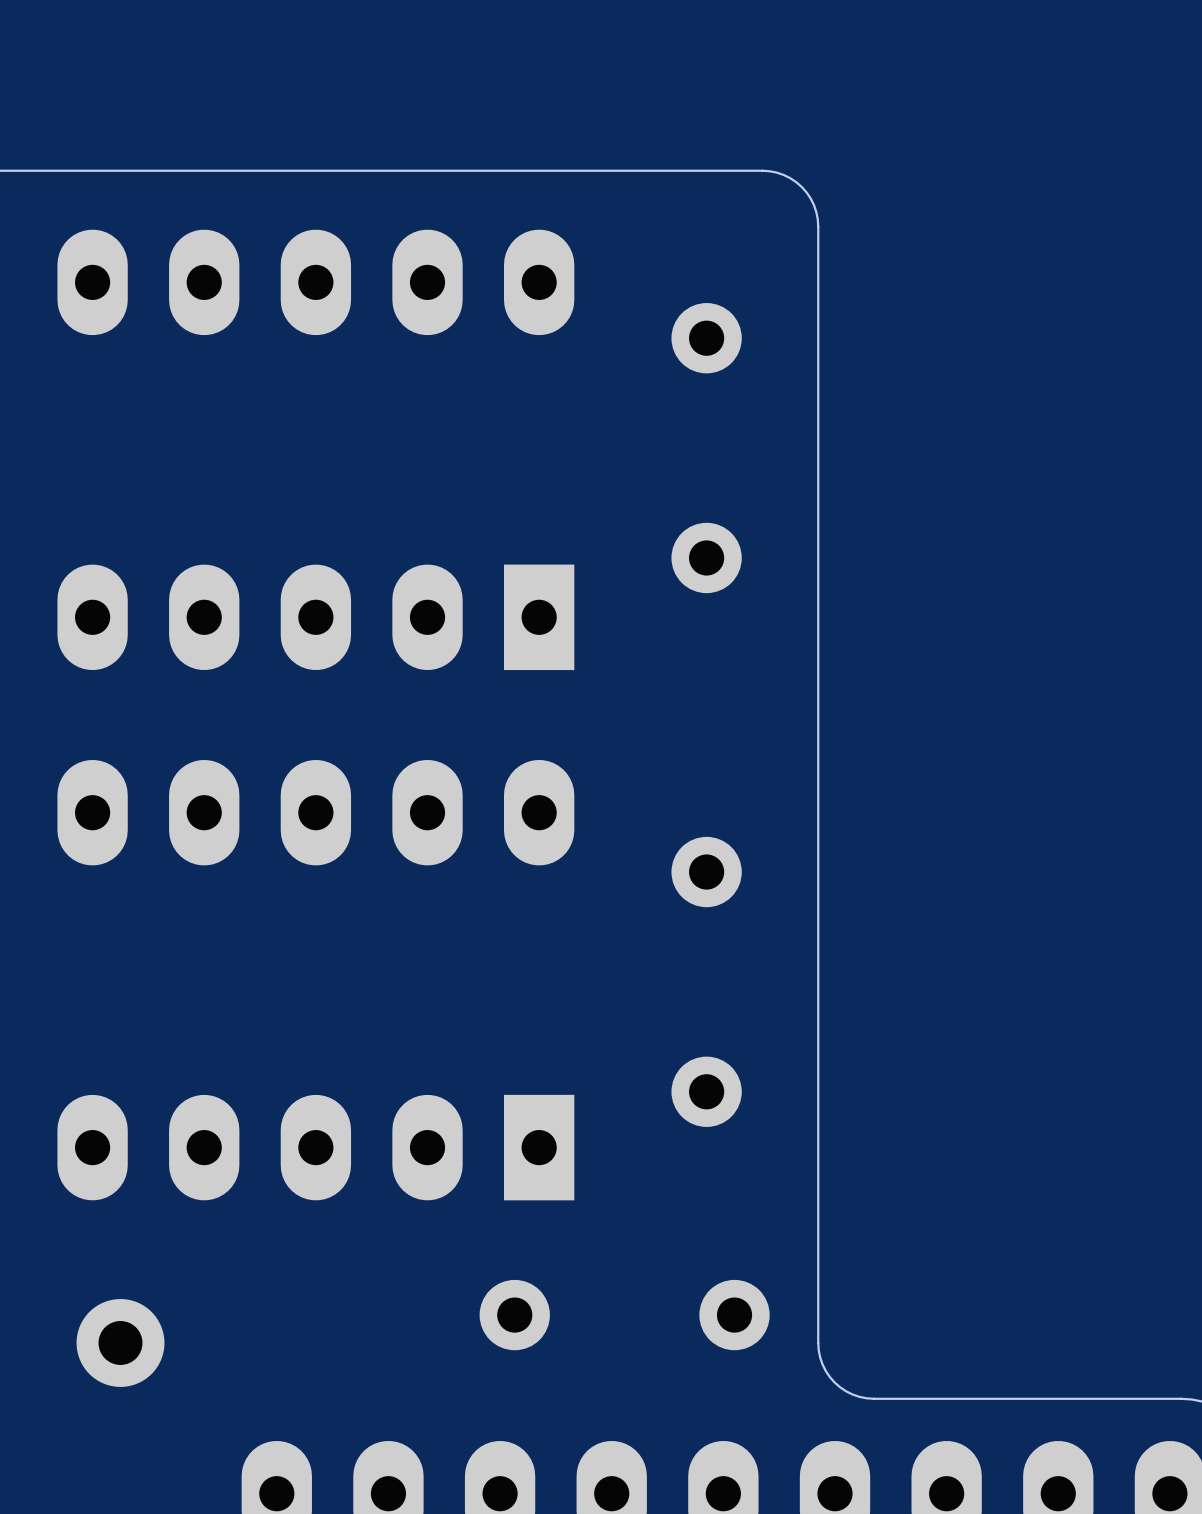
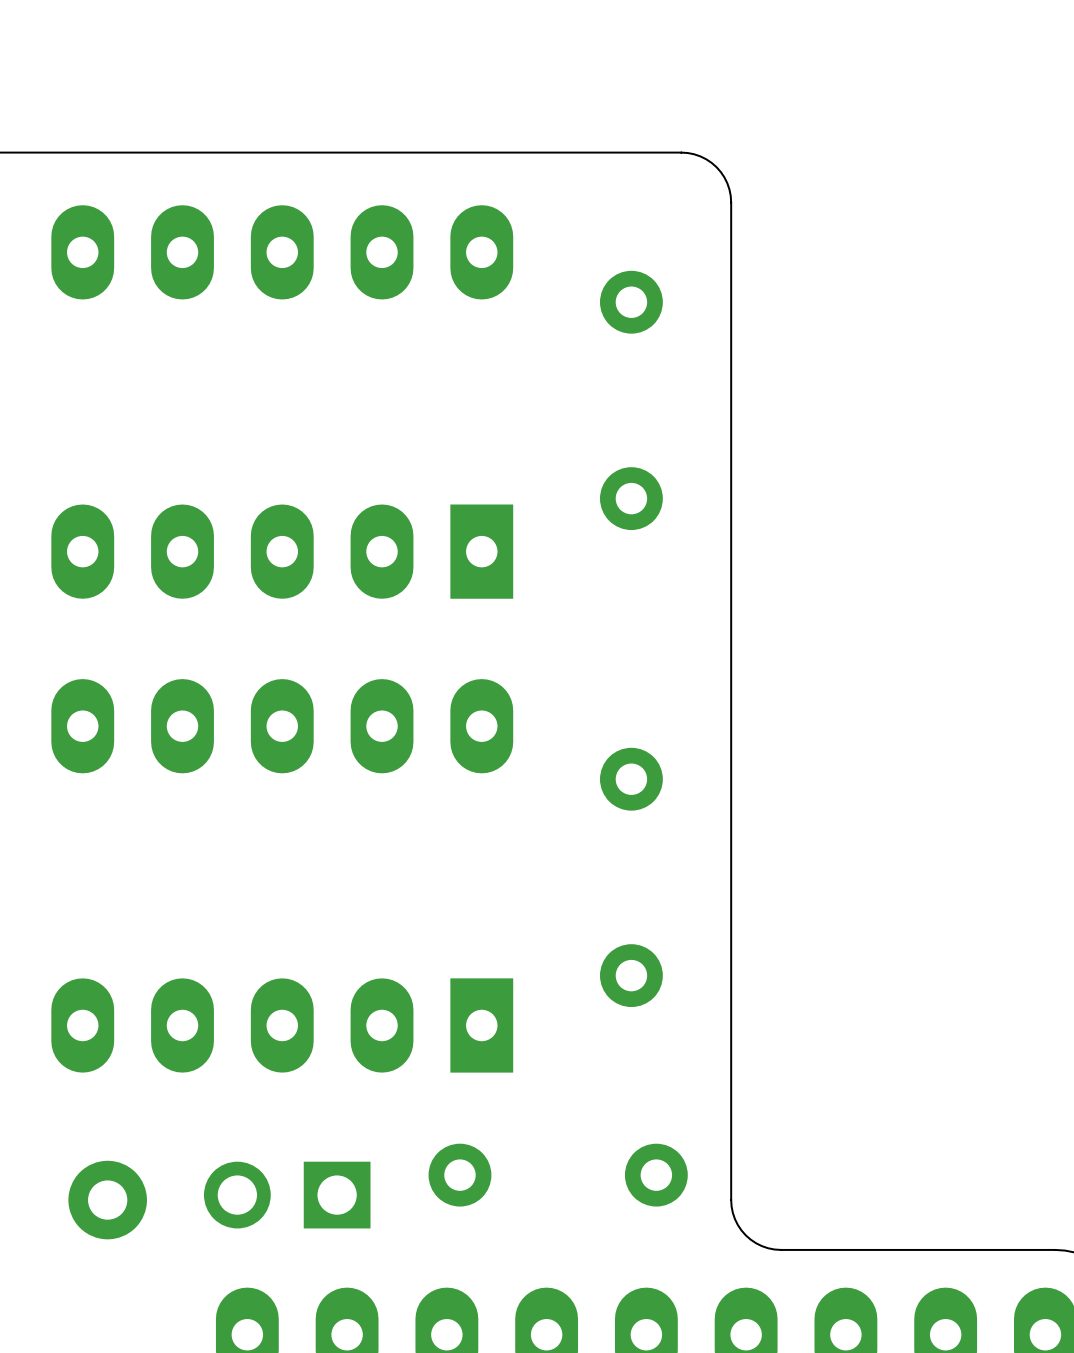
part: none -> (287, 1195)

